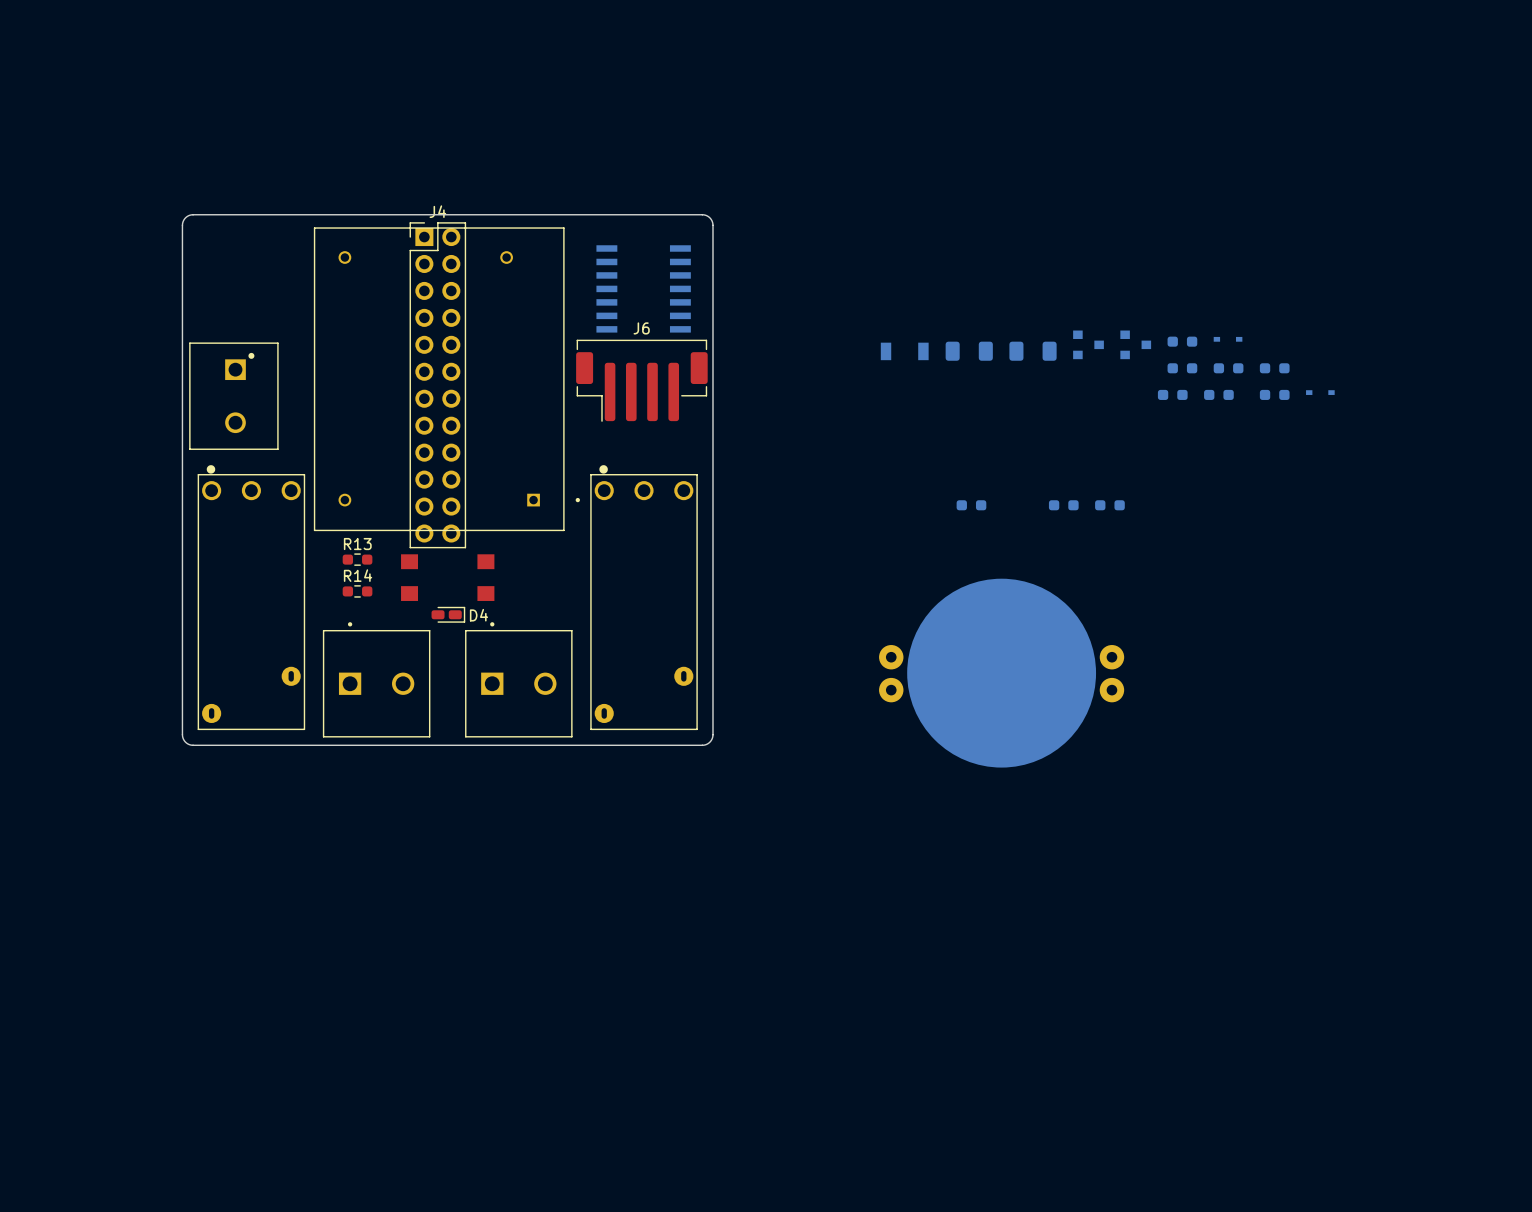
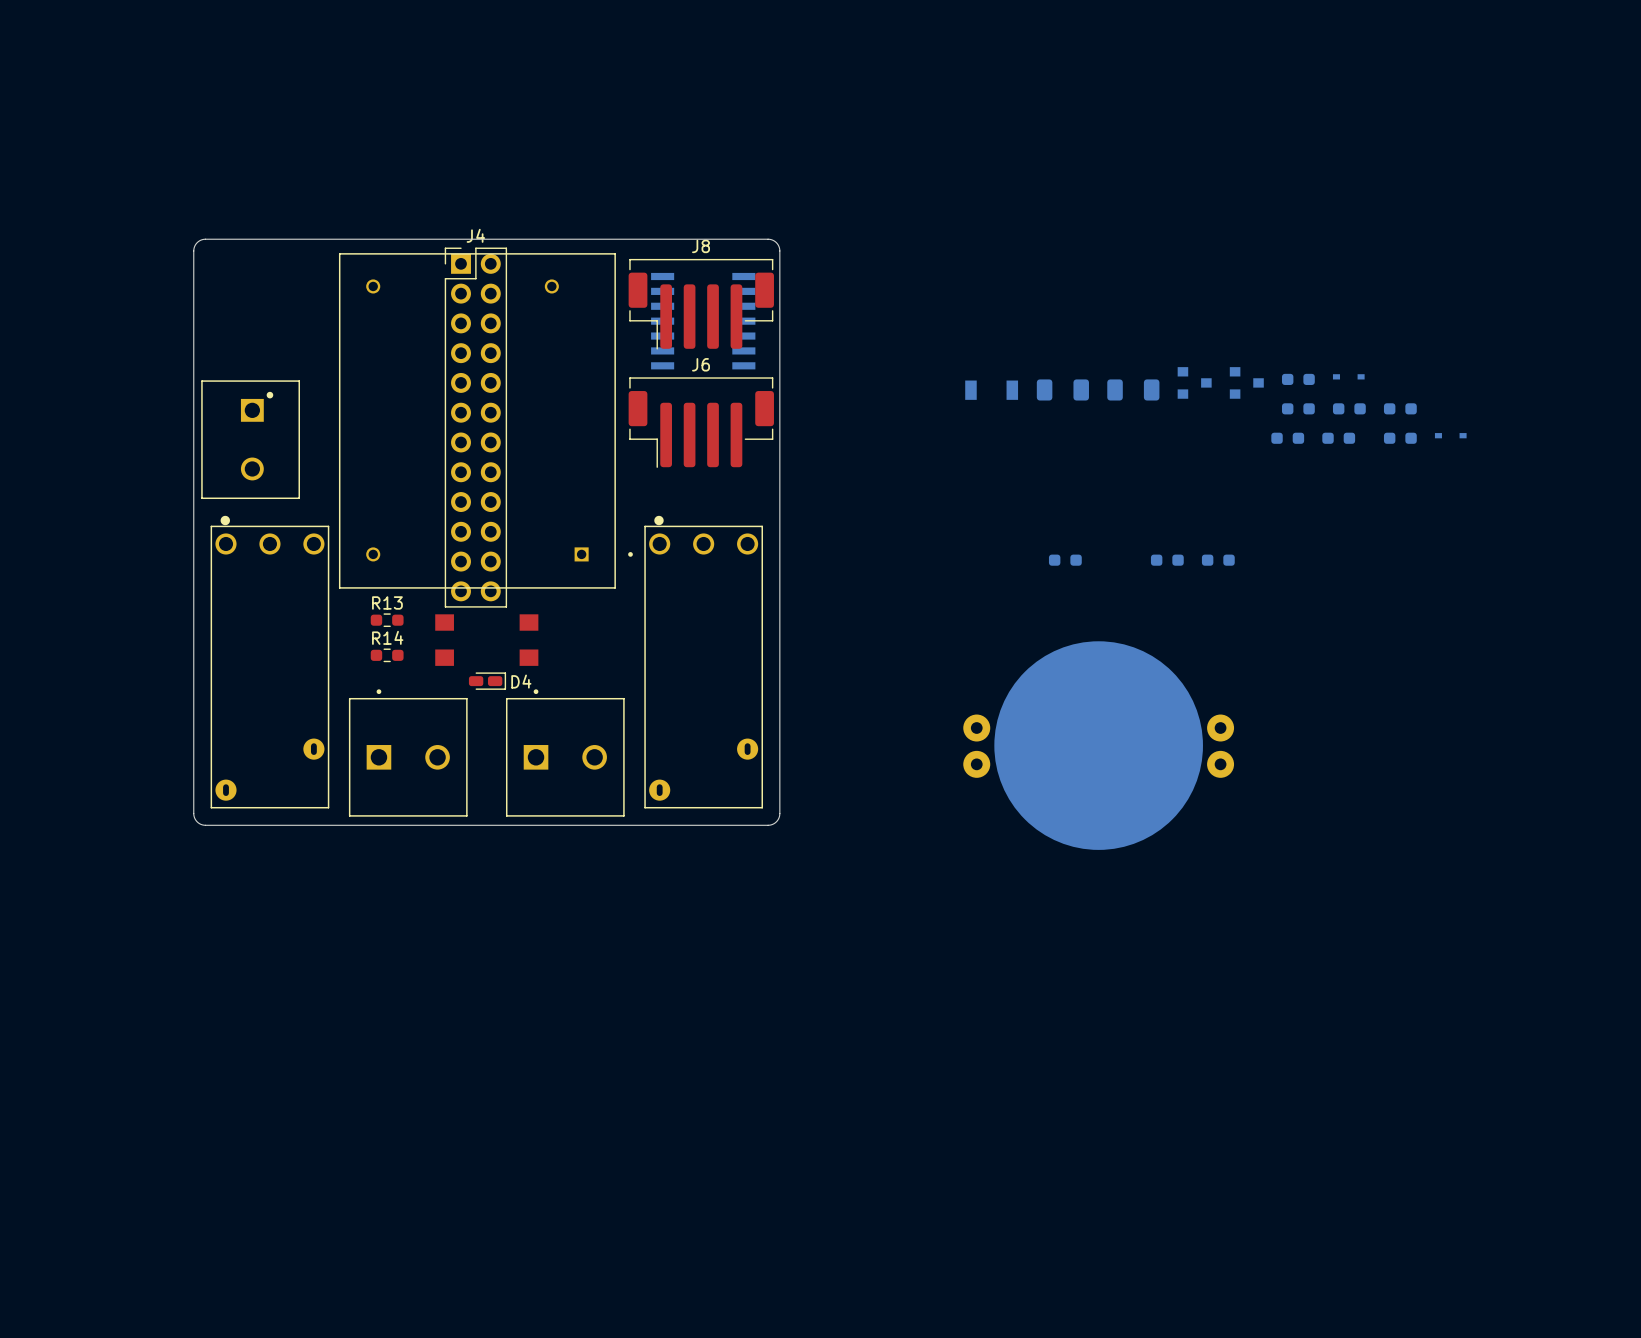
J8: none -> (701, 304)

